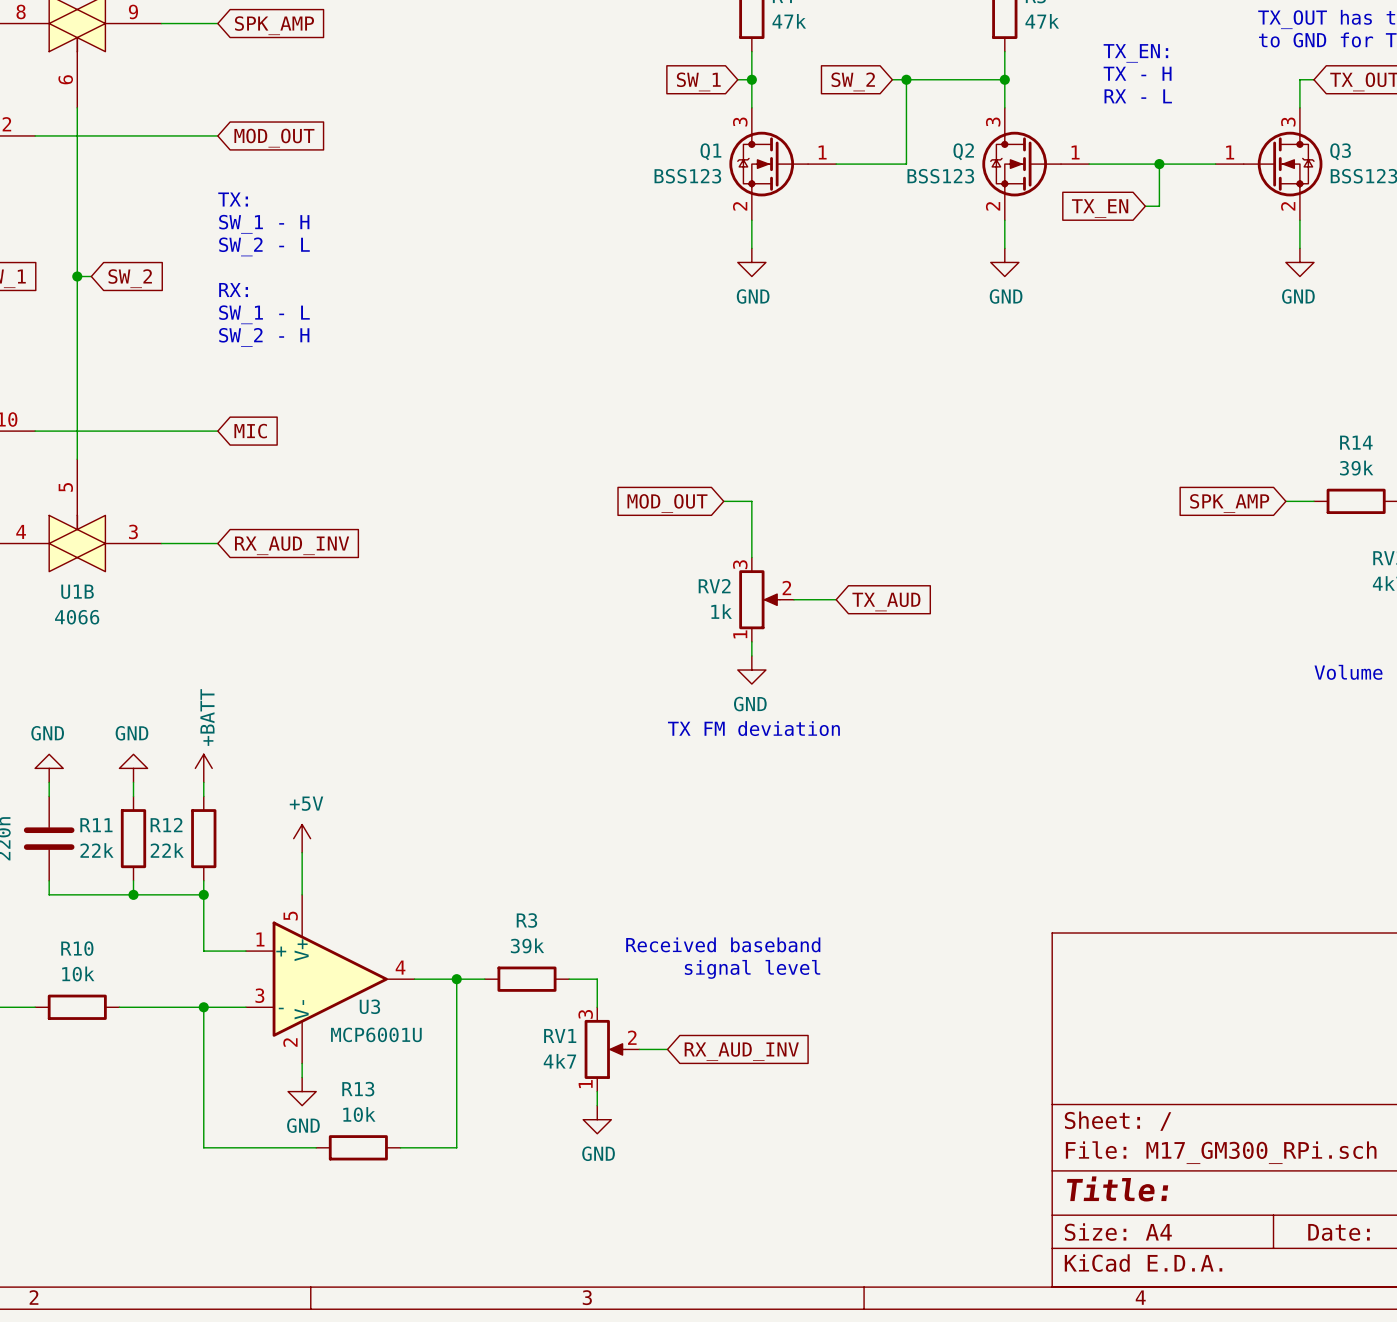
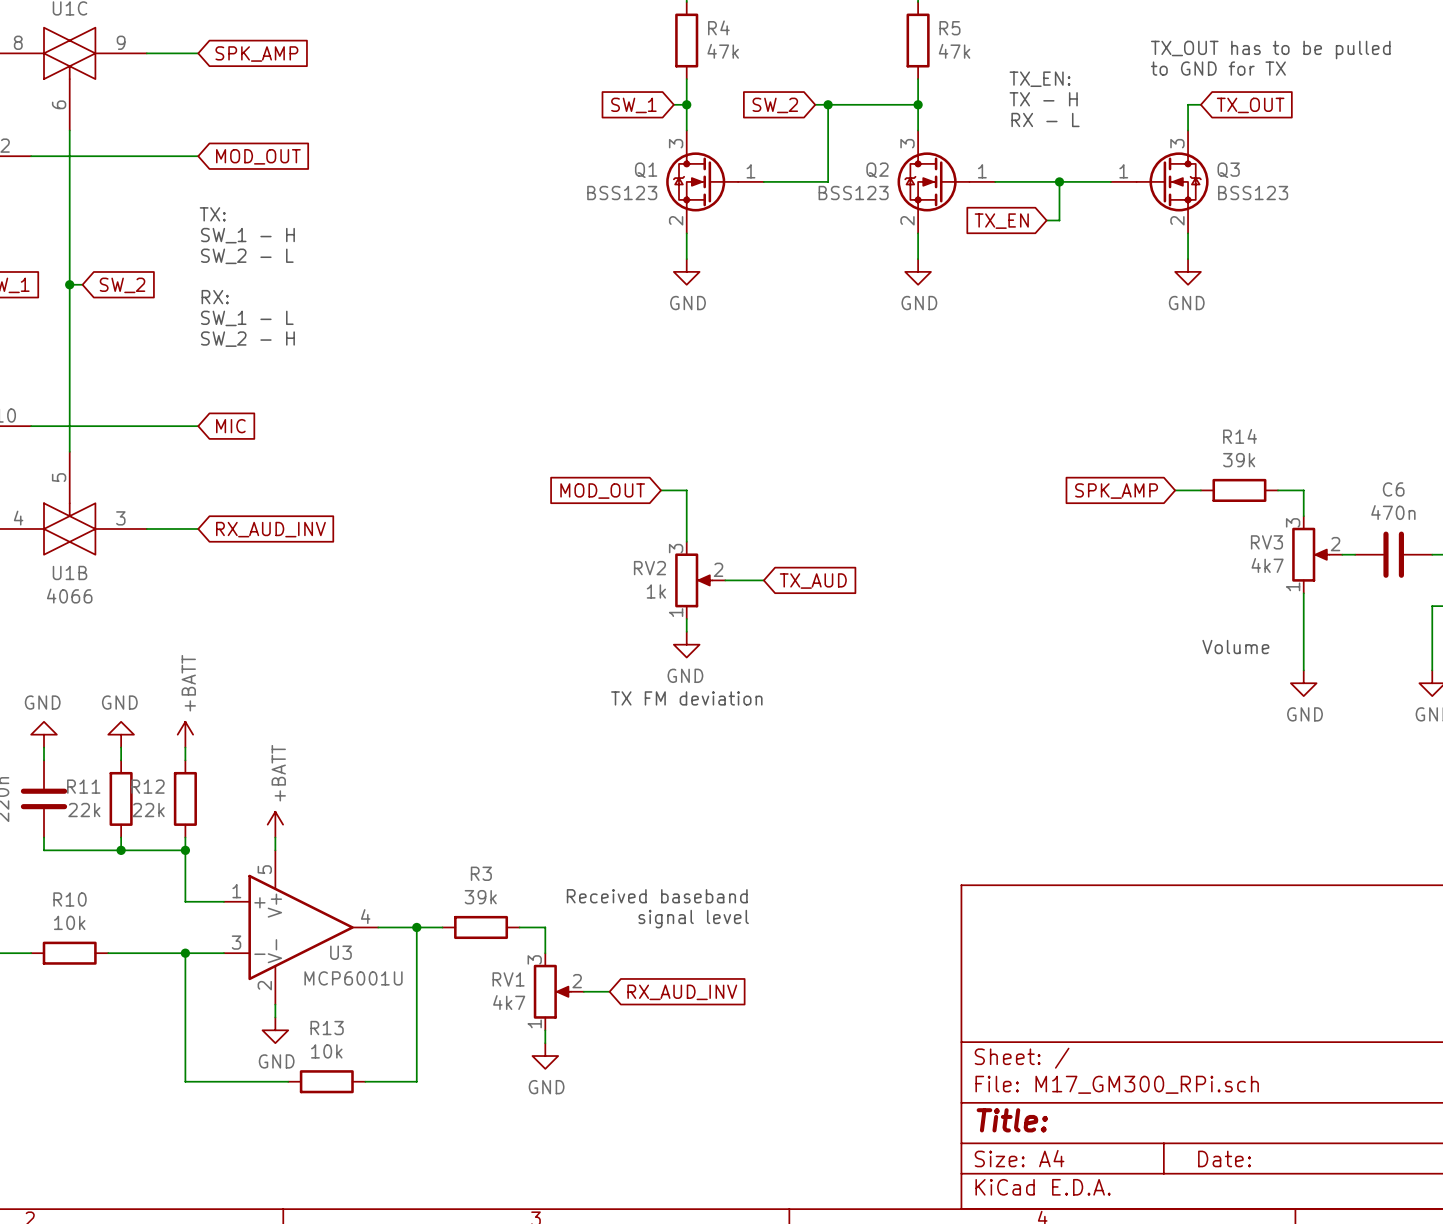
power symbol: +5V (302, 838) -> none
power symbol: none -> +BATT (275, 824)

